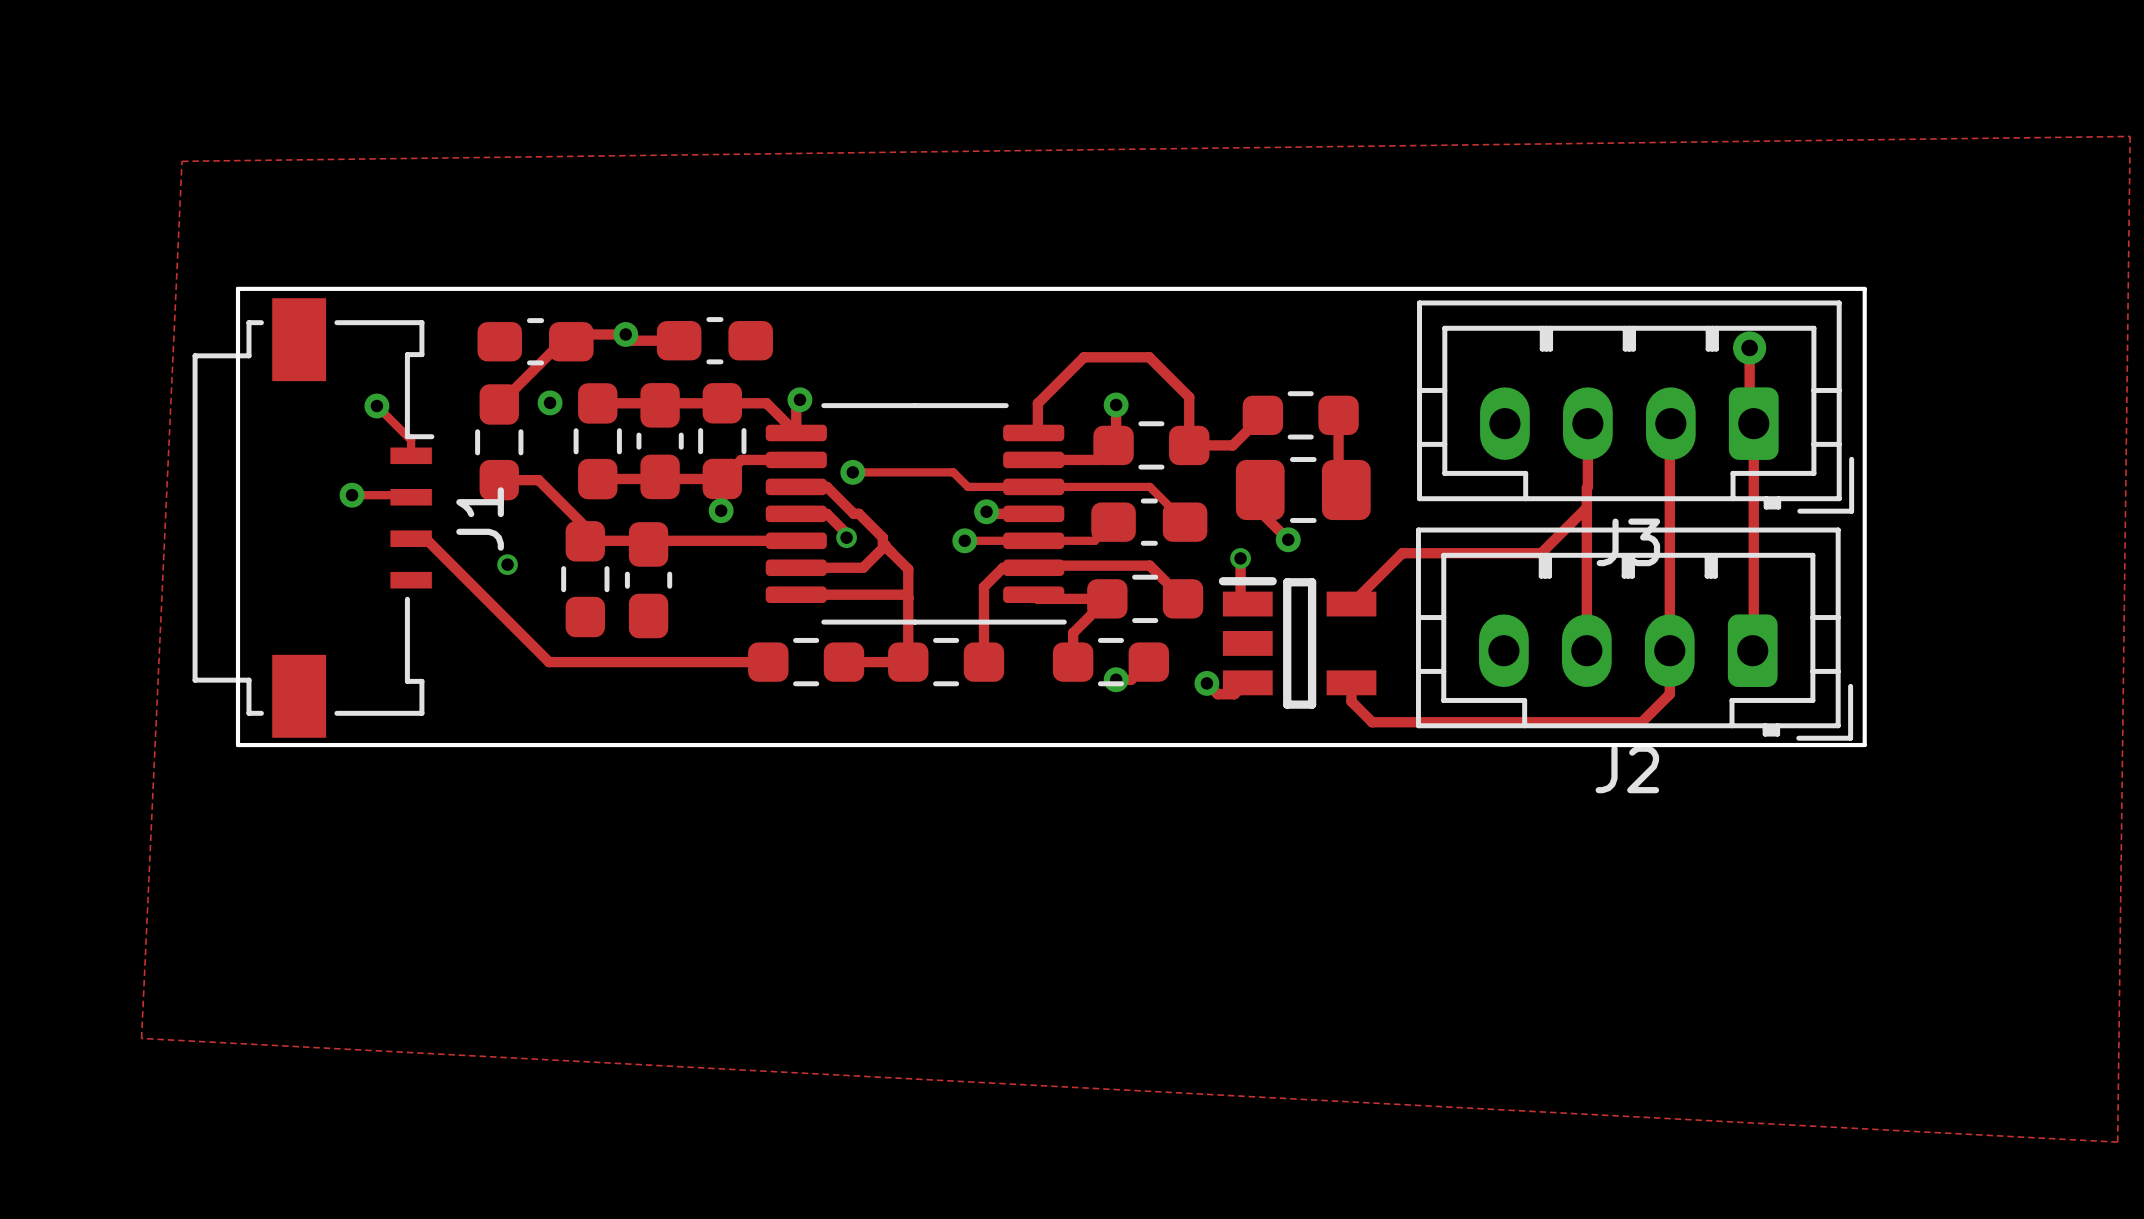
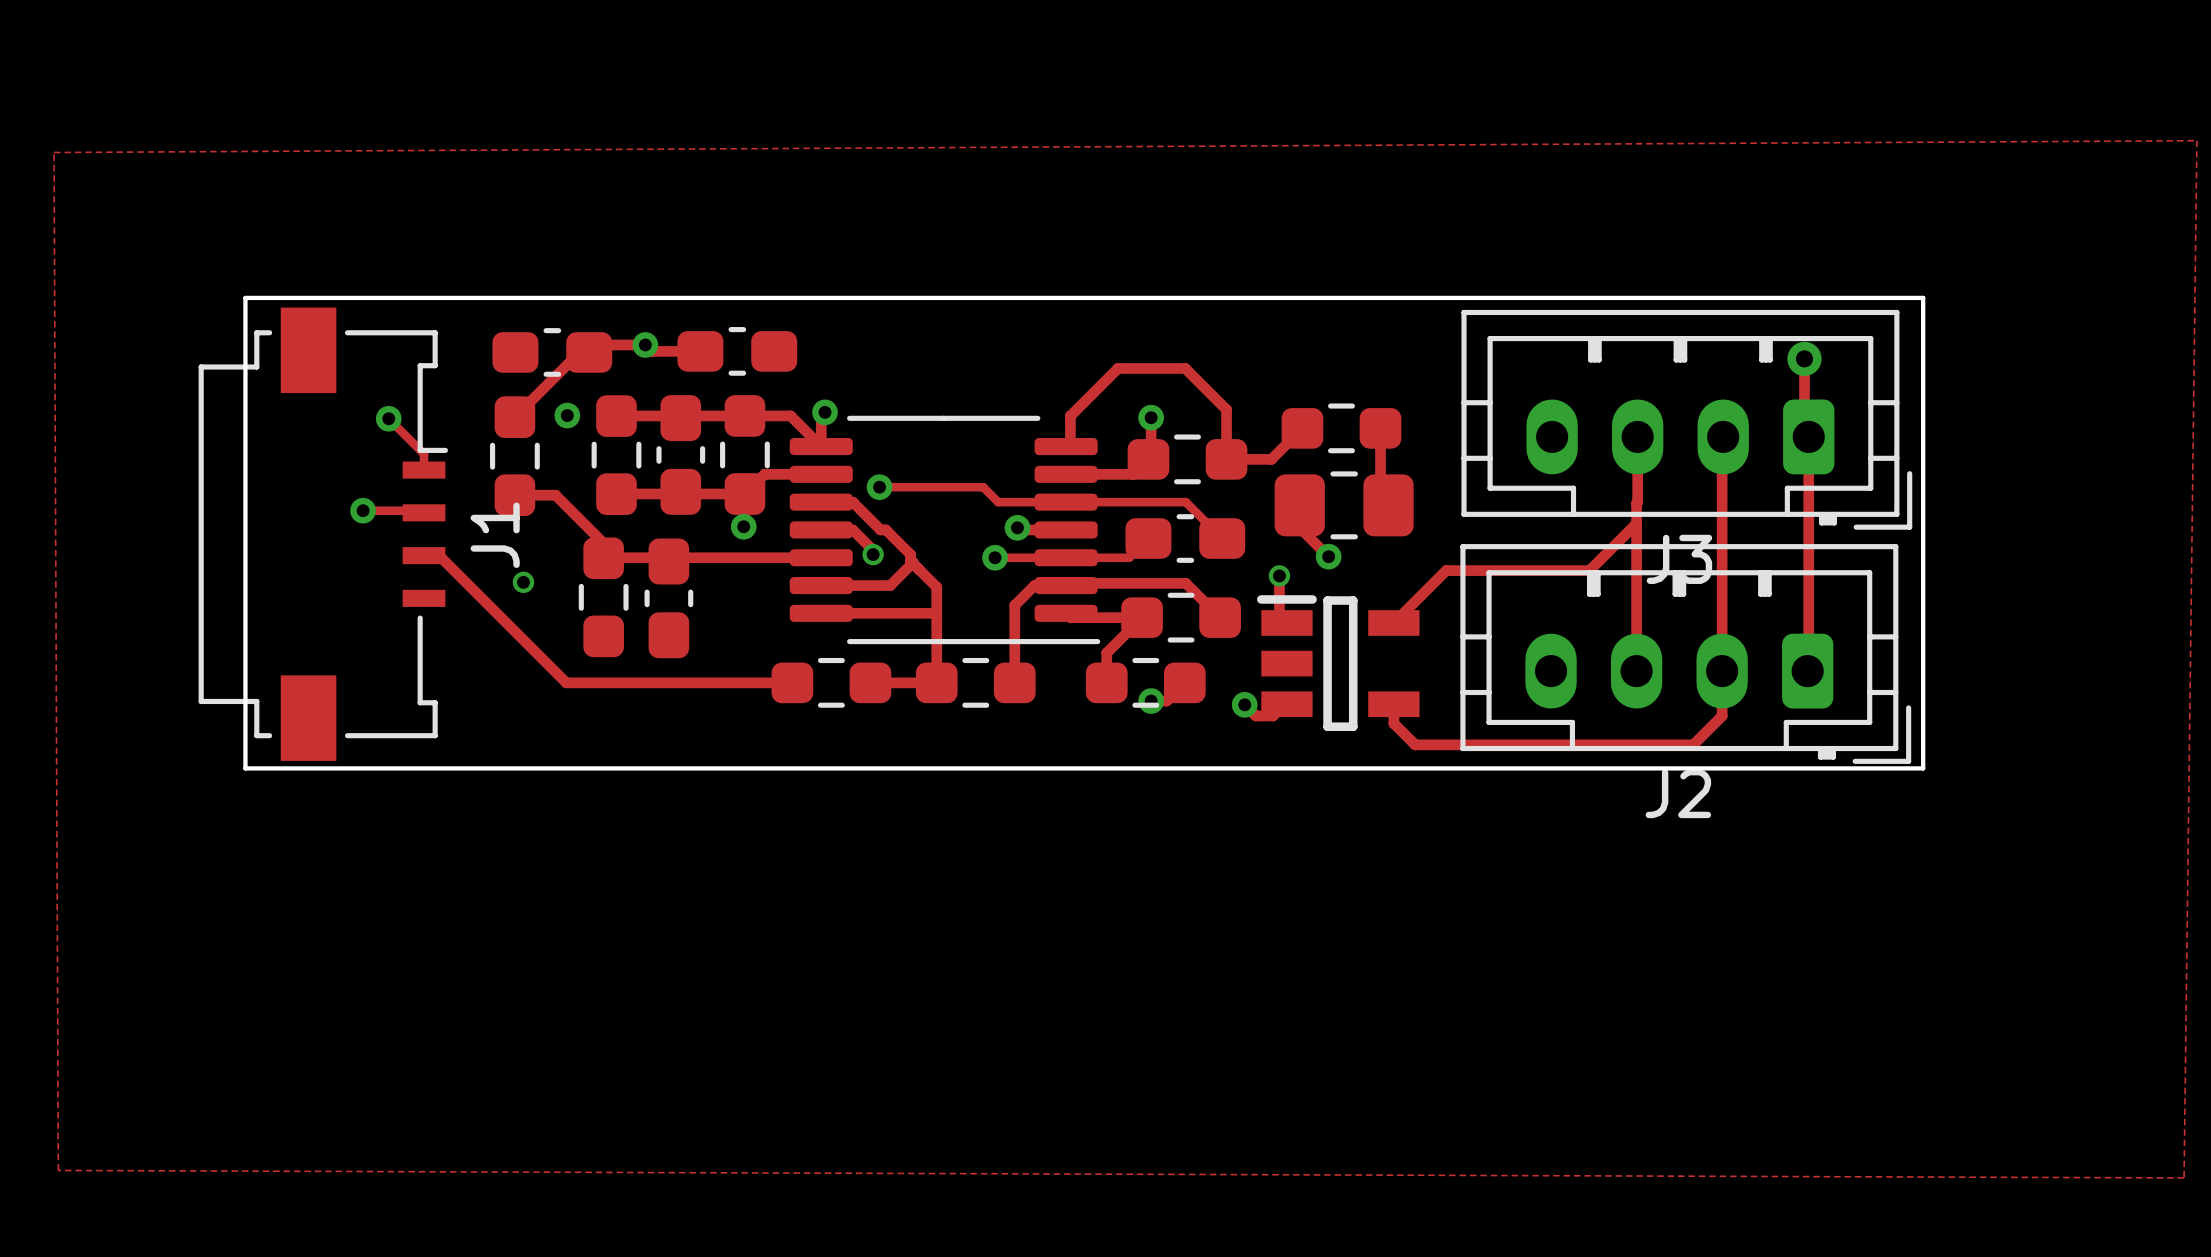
zone outline: (2130, 136) (182, 161) (141, 1038) (2117, 1142) -> (2196, 140) (54, 152) (58, 1170) (2184, 1177)

